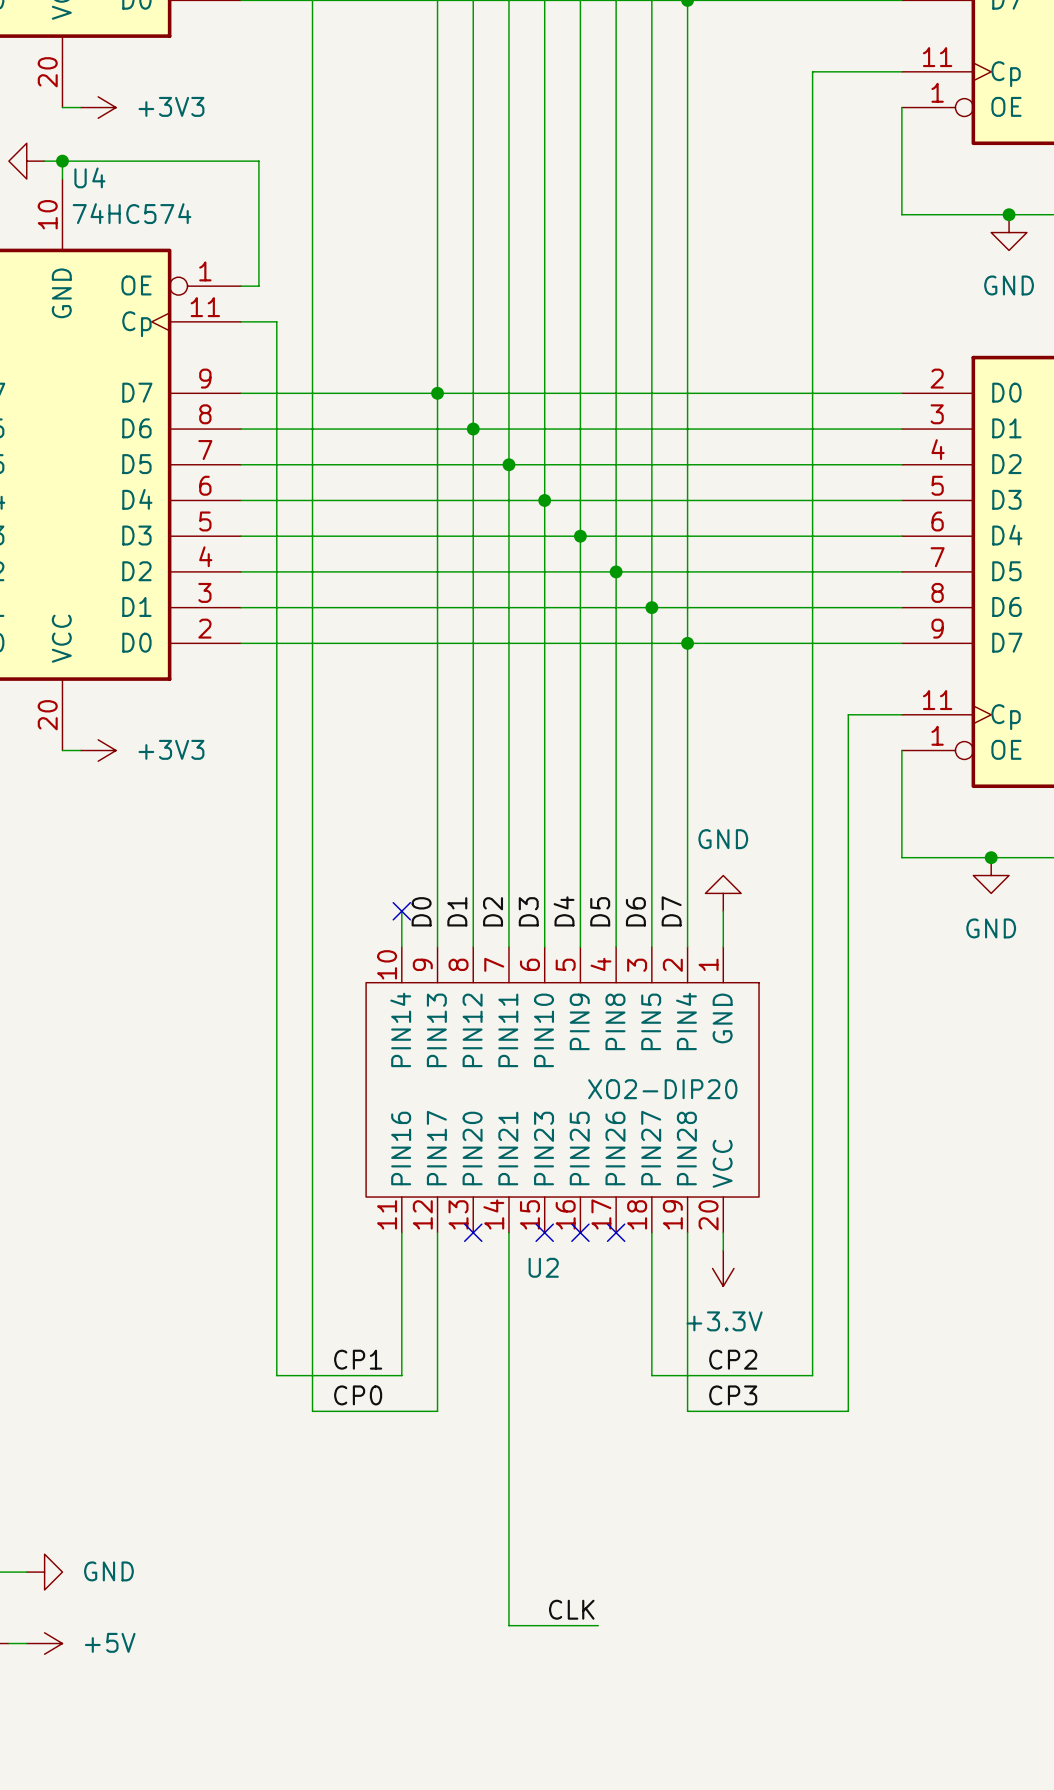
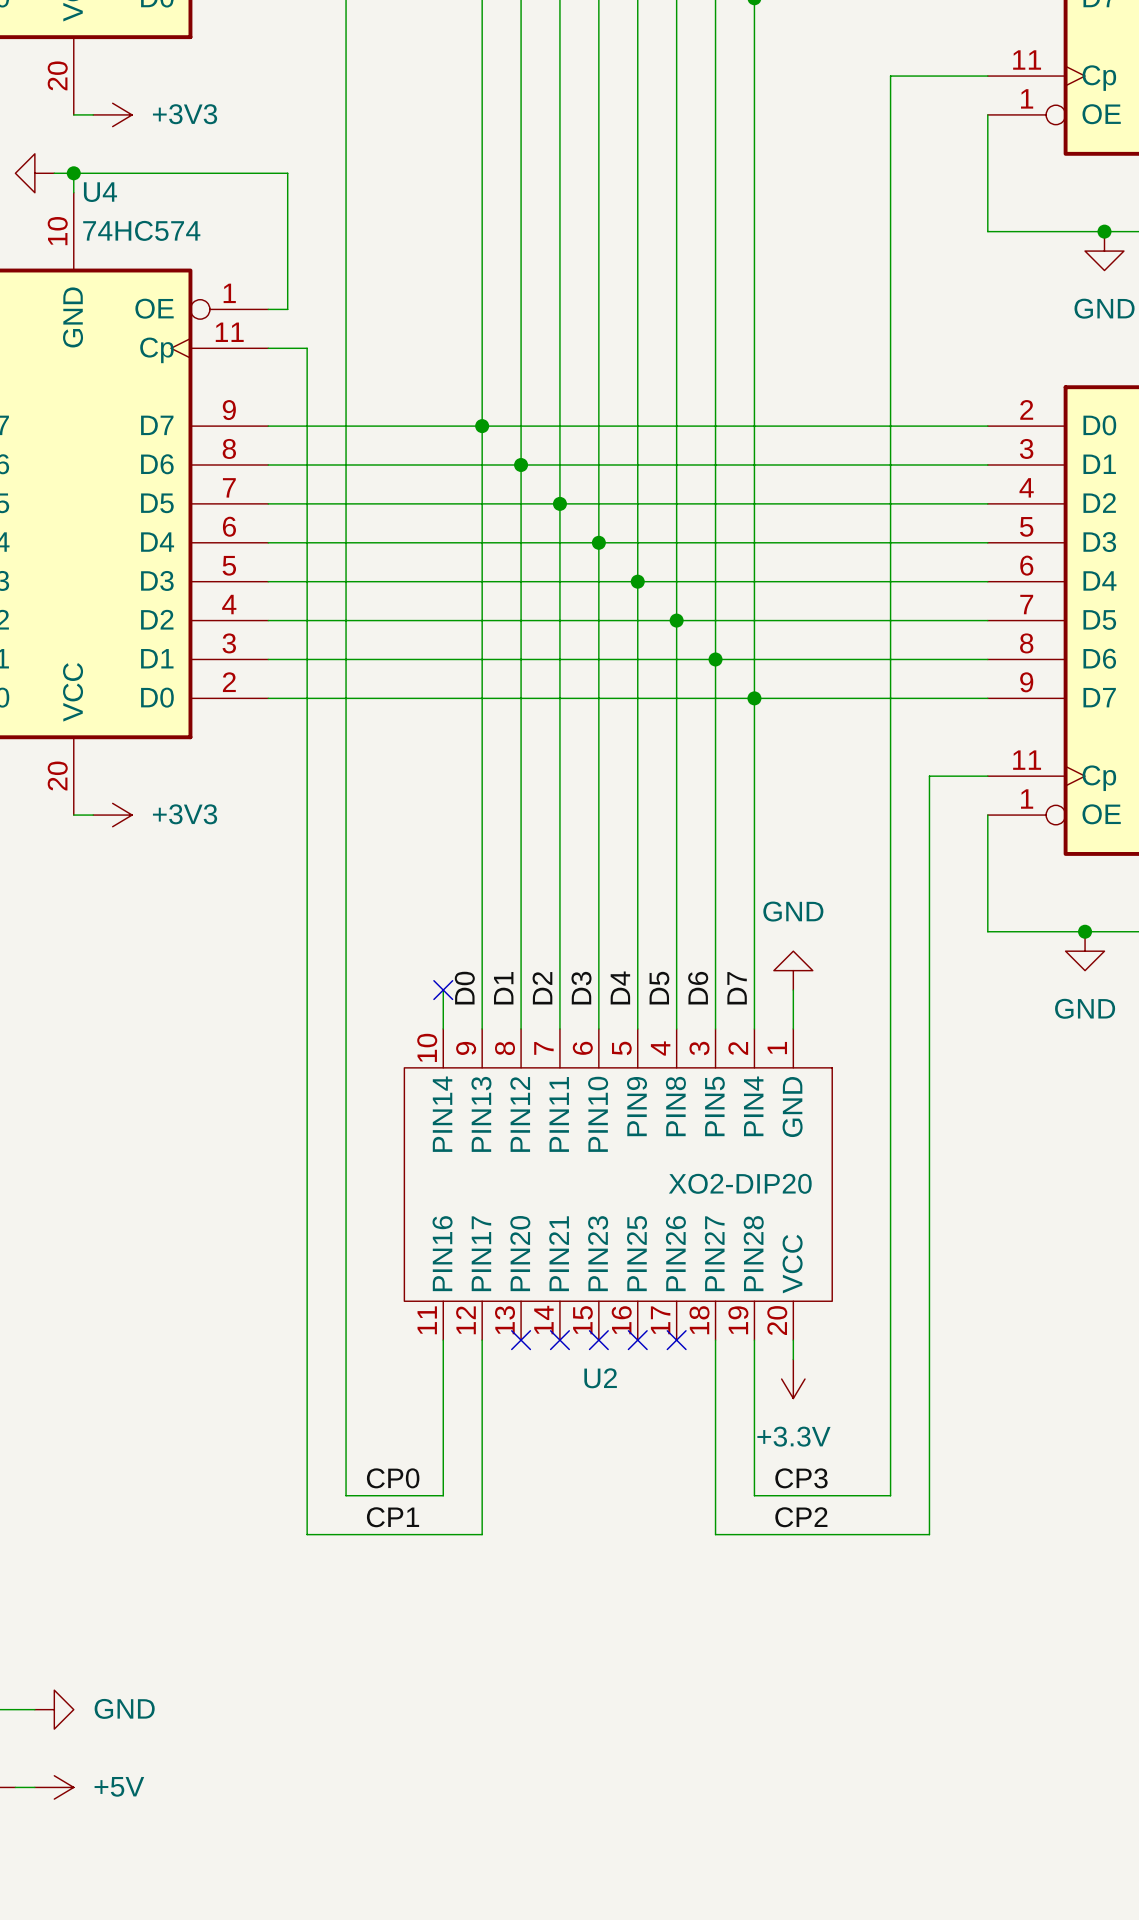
wire: (508, 1232) (508, 1625) (598, 1625) -> none
no-connect mark: none -> (559, 1340)
label: CP1 (358, 1359) -> CP0 (393, 1478)
label: CP2 (733, 1359) -> CP3 (801, 1478)
wire: (276, 1375) (312, 1375) (312, 1411) -> (307, 1495) (307, 1534) (346, 1534)
wire: (651, 1375) (687, 1375) (687, 1411) -> (715, 1495) (715, 1534) (754, 1534)
label: CP0 (358, 1395) -> CP1 (393, 1517)
label: CP3 (733, 1395) -> CP2 (801, 1517)
label: CLK (571, 1609) -> none

